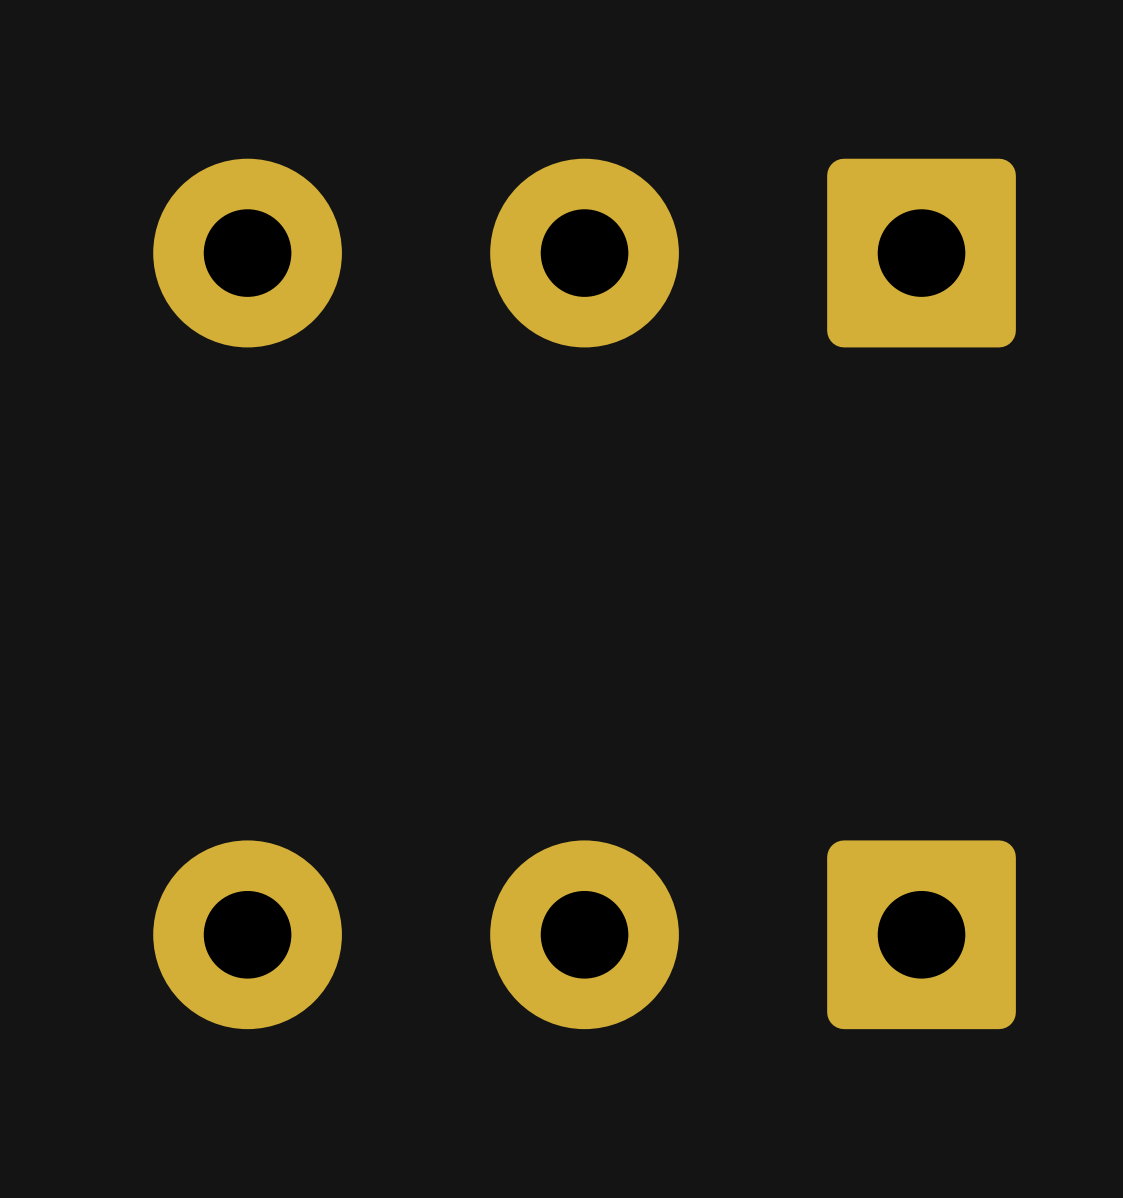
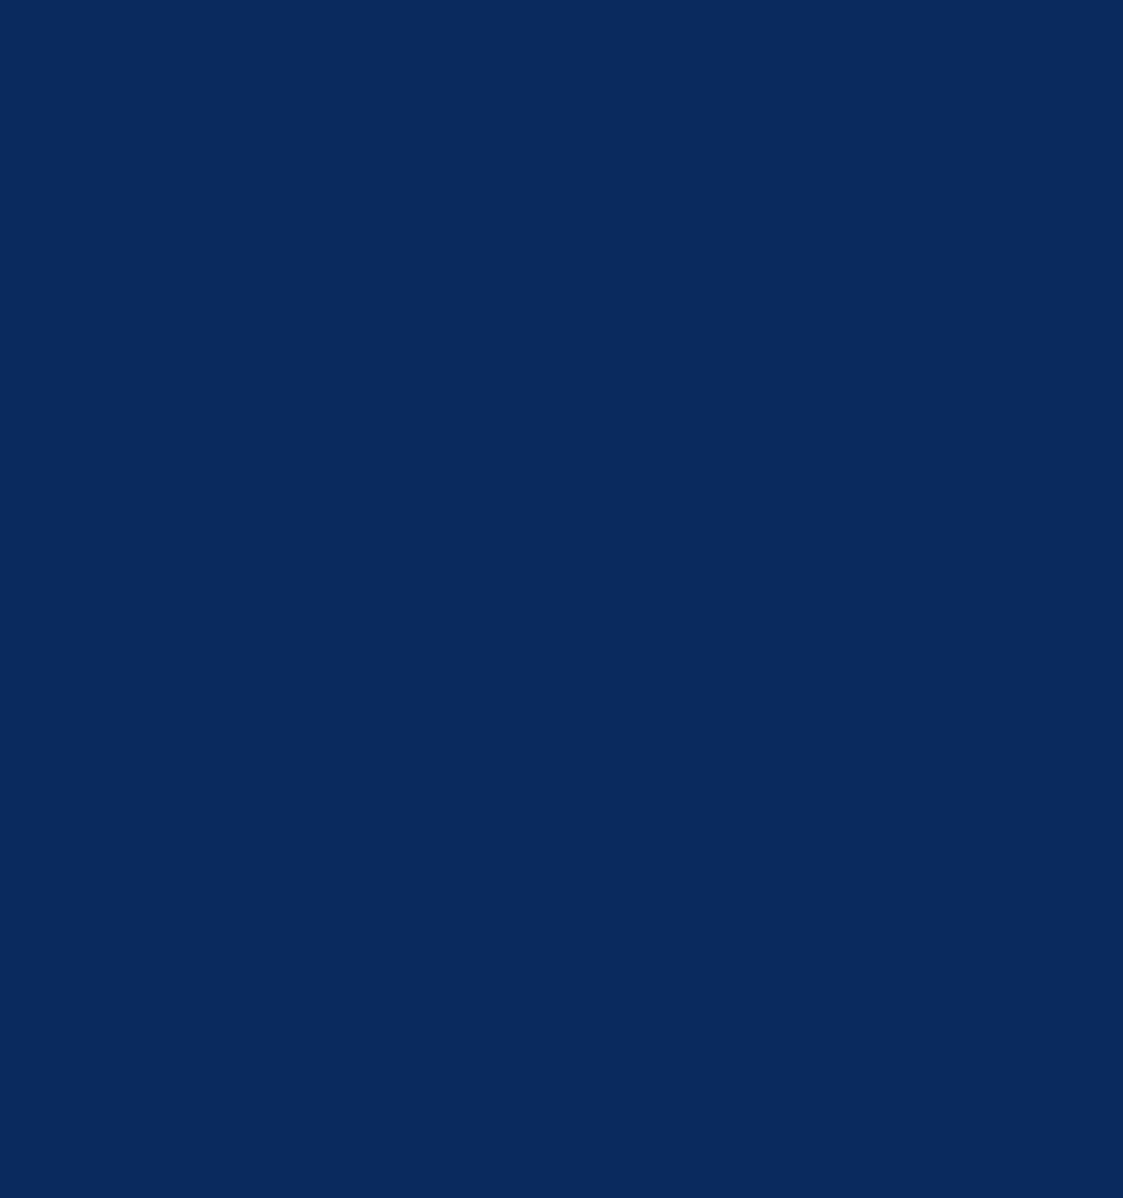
part: (584, 253) -> none
part: (584, 934) -> none

